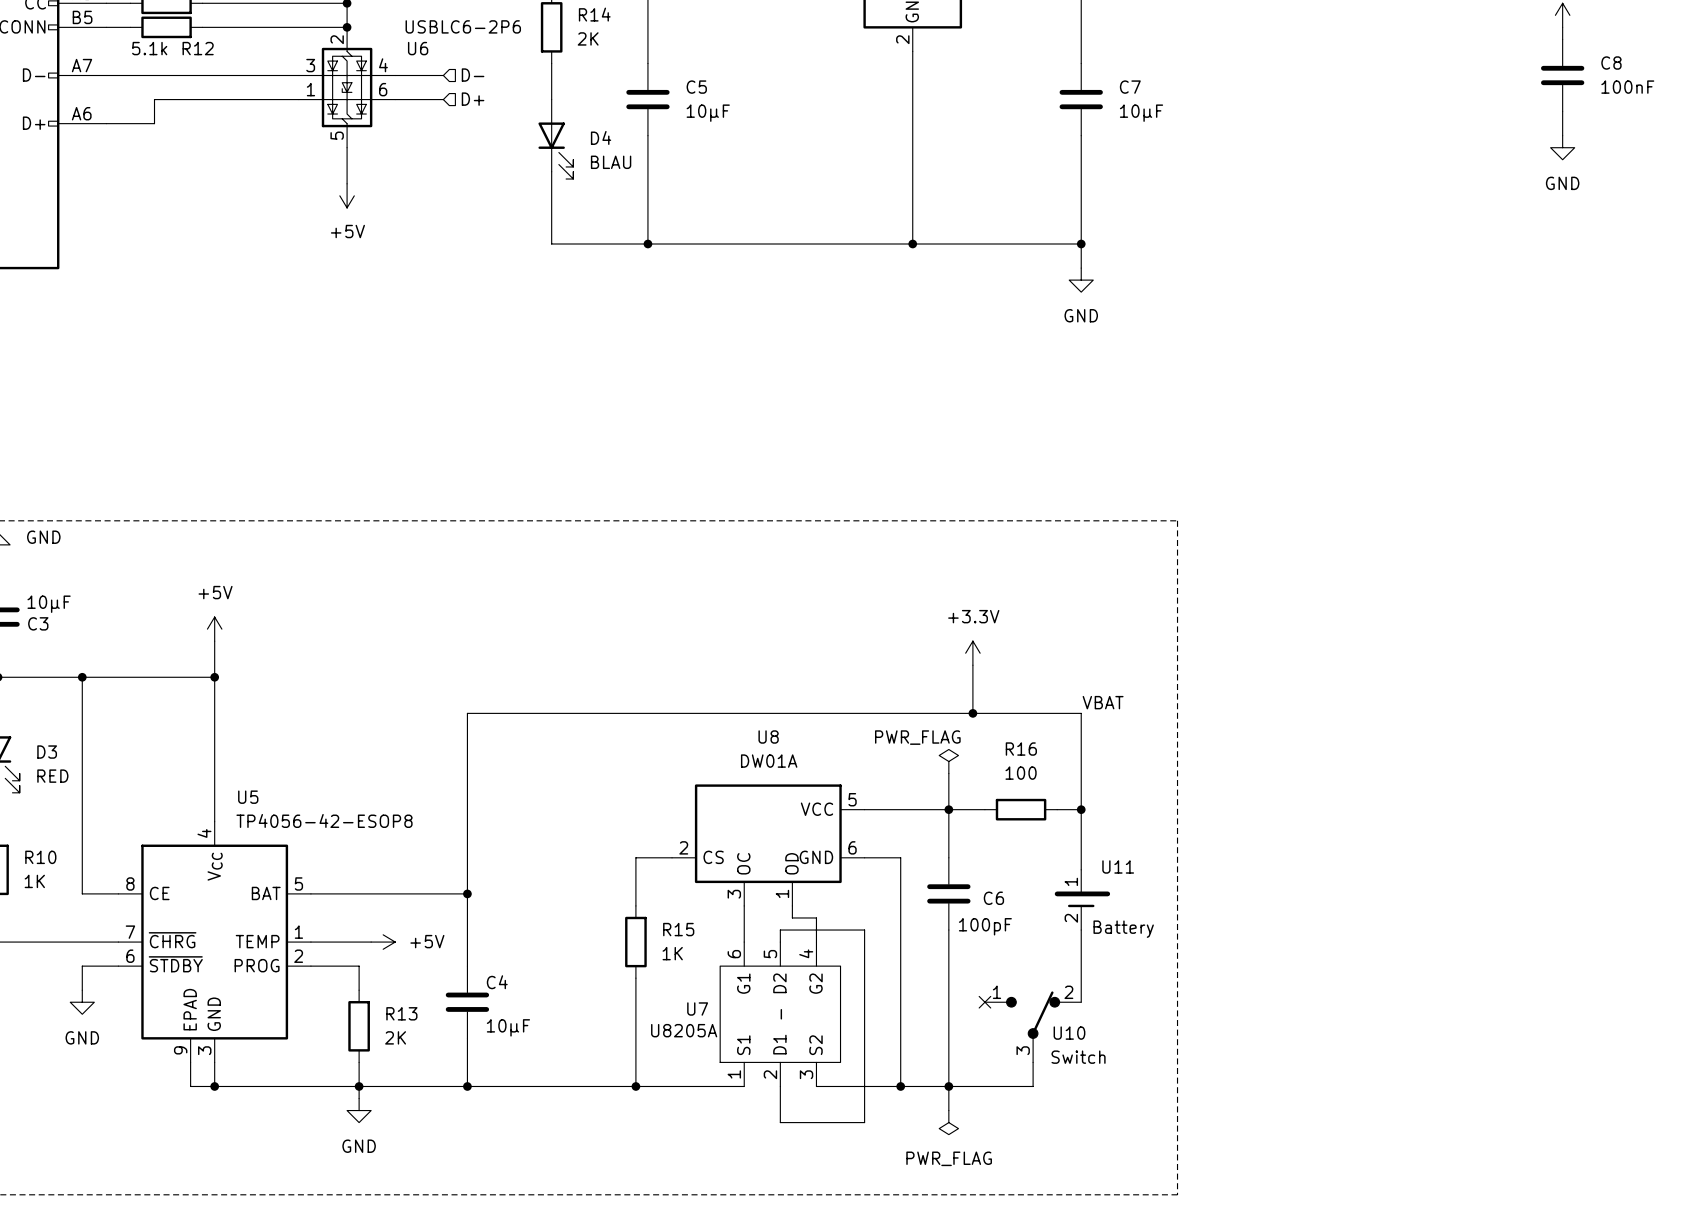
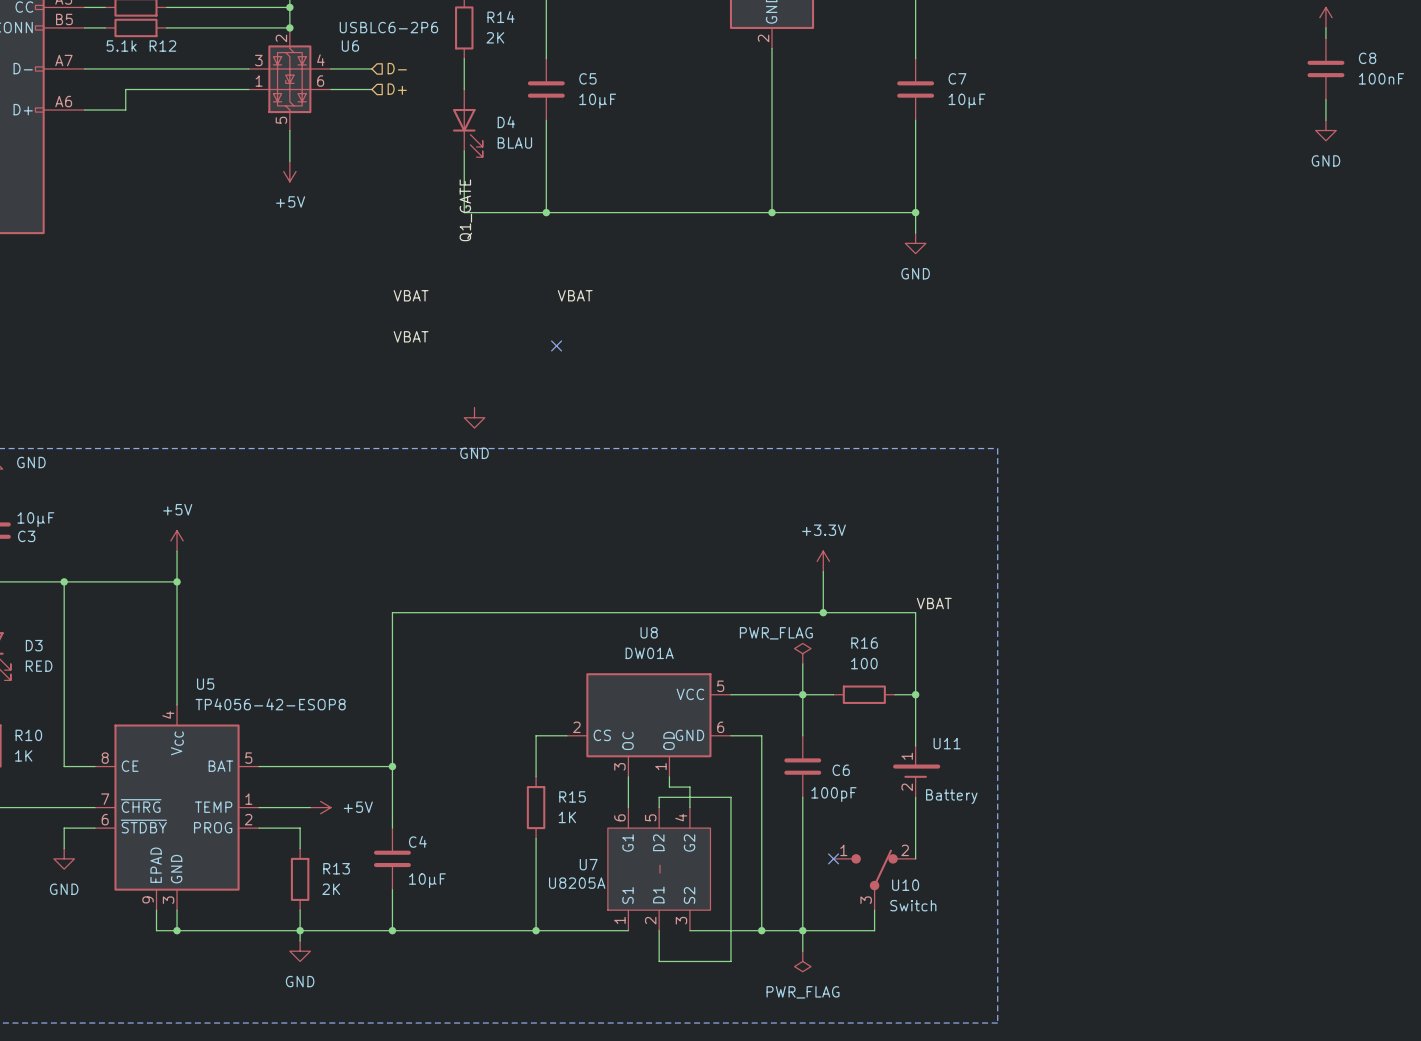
label: none -> Q1_GATE (465, 210)
label: none -> VBAT (411, 295)
label: none -> VBAT (575, 295)
label: none -> VBAT (411, 336)
no-connect mark: none -> (556, 345)
power symbol: none -> GND (474, 417)

